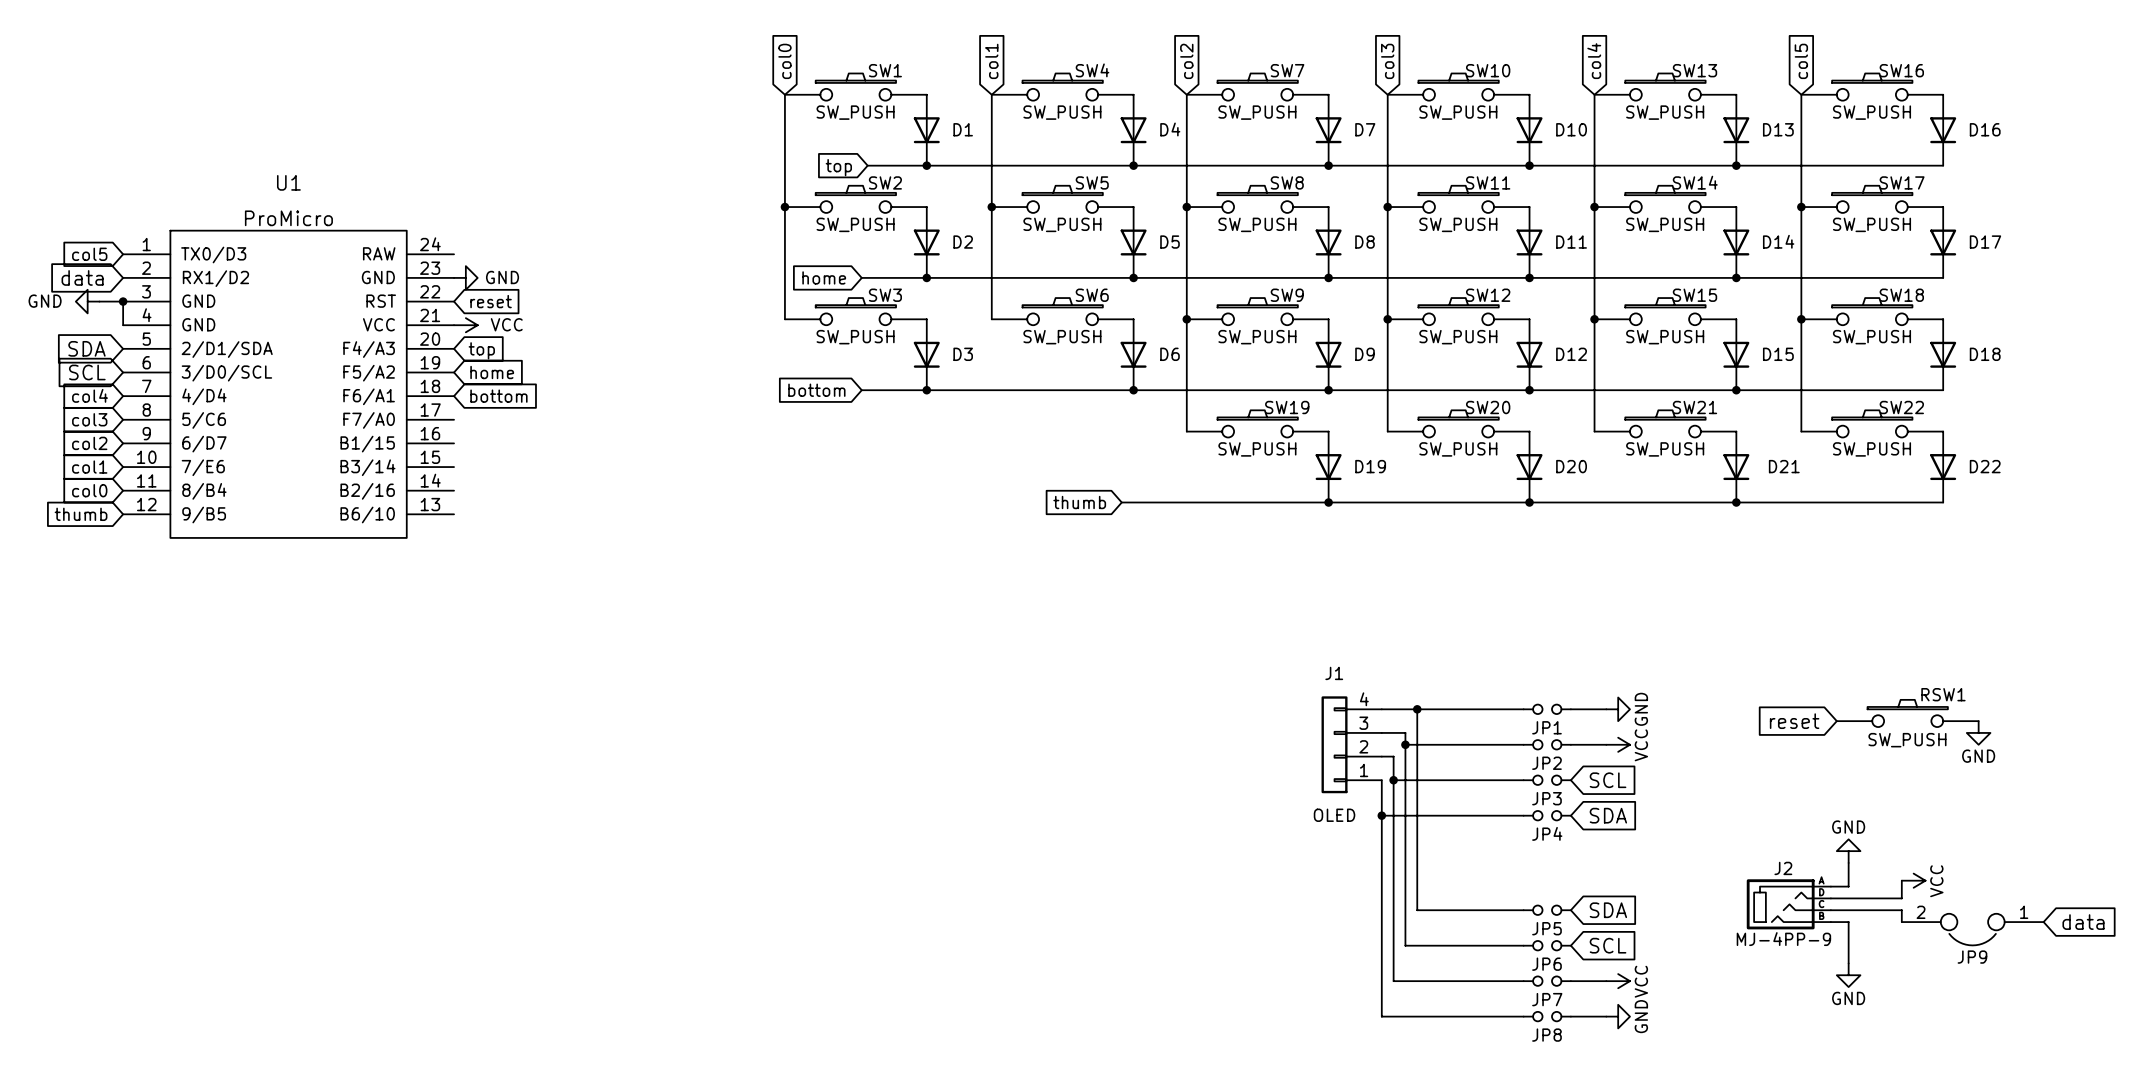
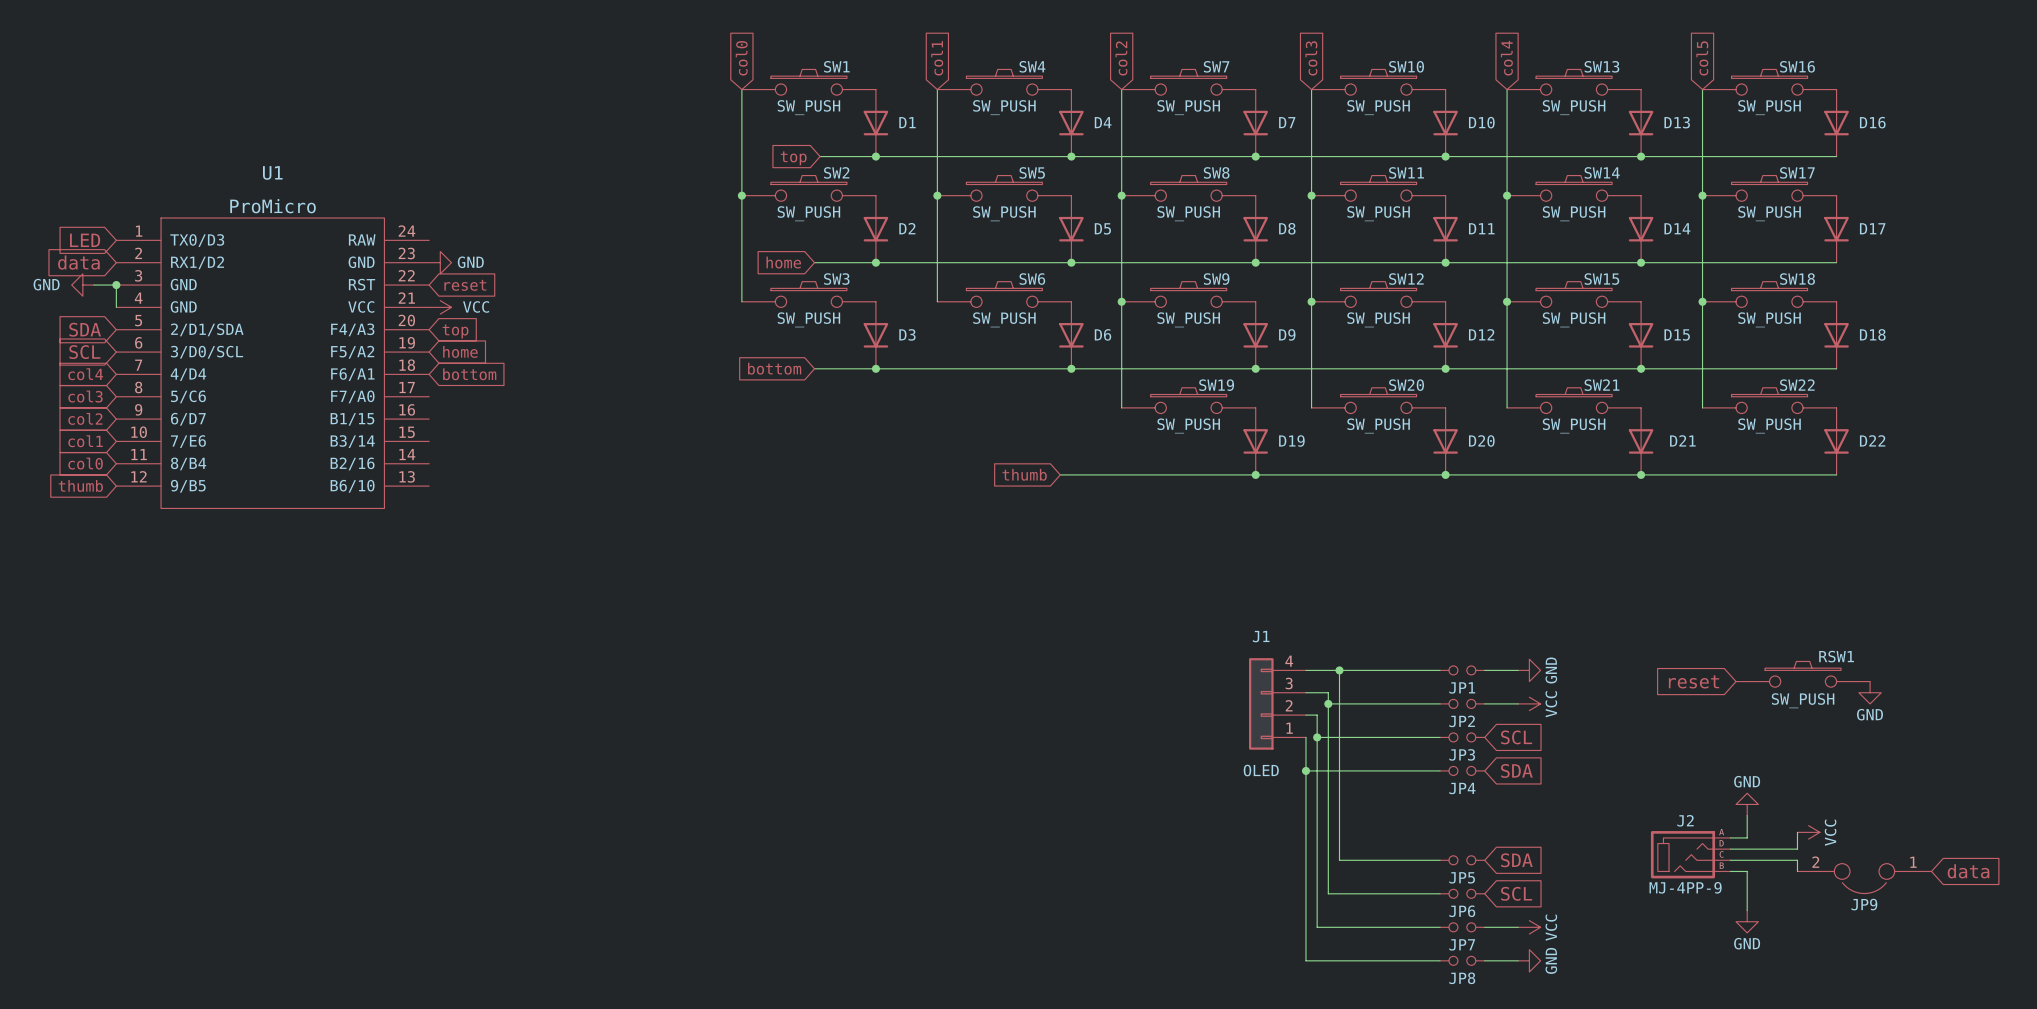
global label: col5 (89, 254) -> LED (85, 240)

